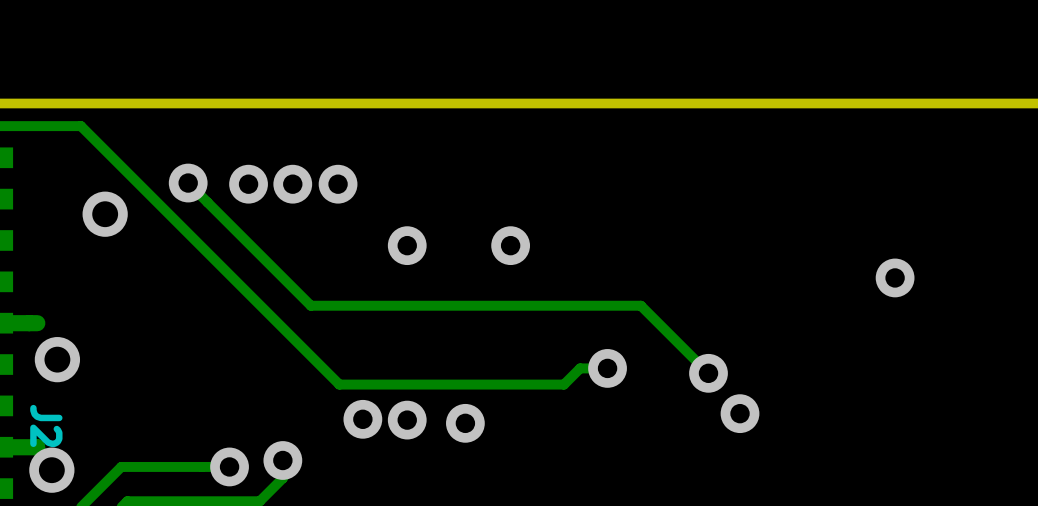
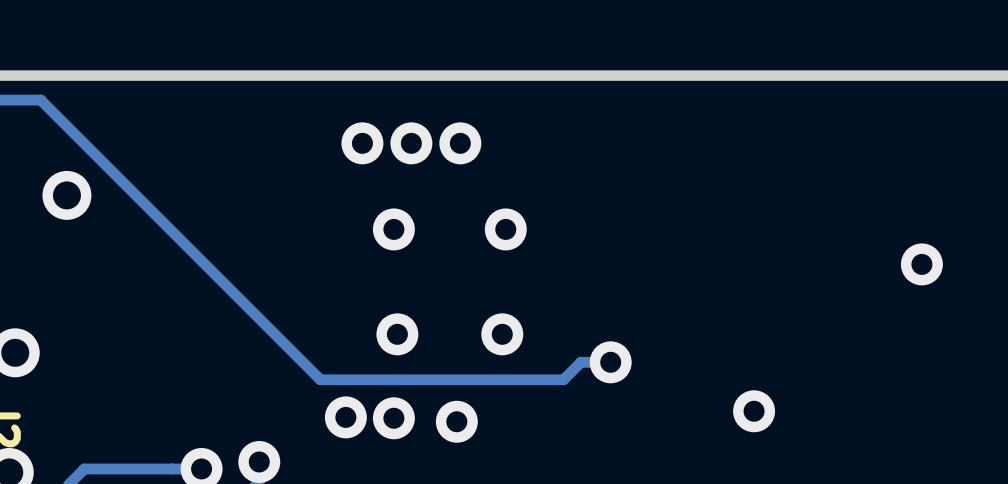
via: none -> (362, 143)
via: none -> (411, 143)
via: none -> (460, 143)
track: (188, 183) (310, 305) (640, 305) (708, 373) -> none
via: (188, 183) -> none
via: (248, 184) -> none
via: (292, 184) -> none
via: (338, 184) -> none
via: none -> (397, 334)
via: none -> (502, 334)
via: (708, 373) -> none

